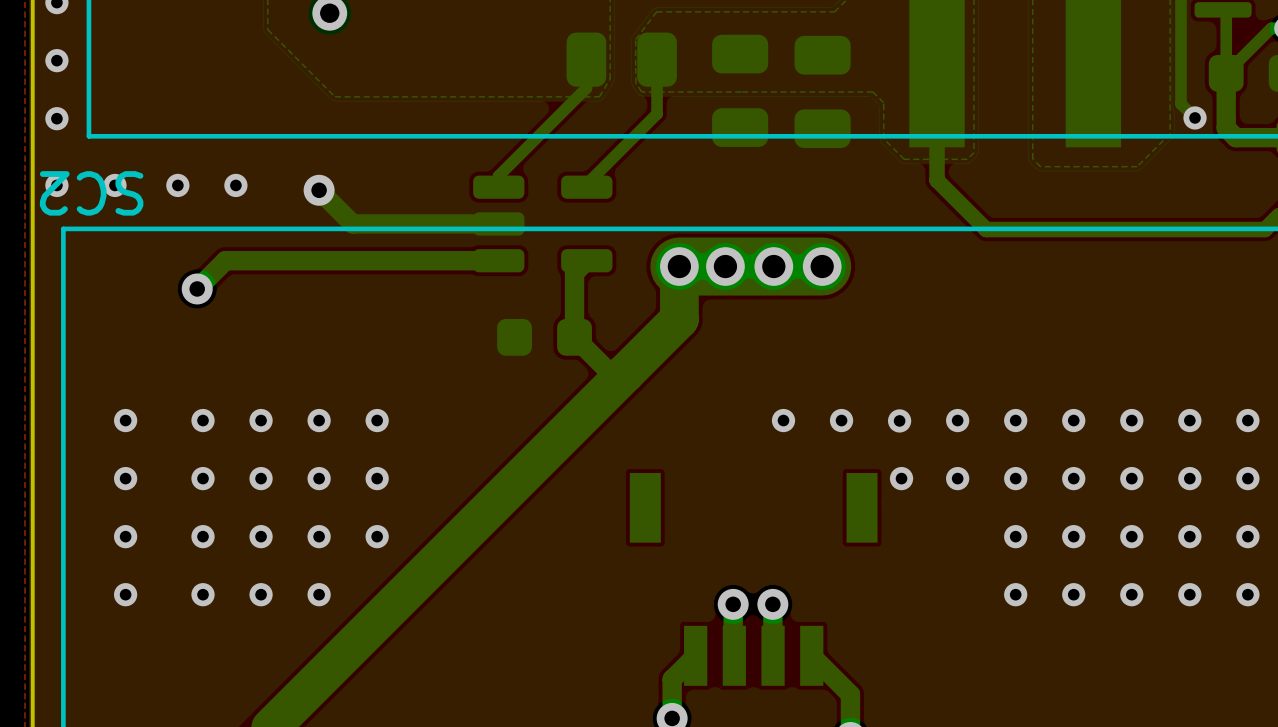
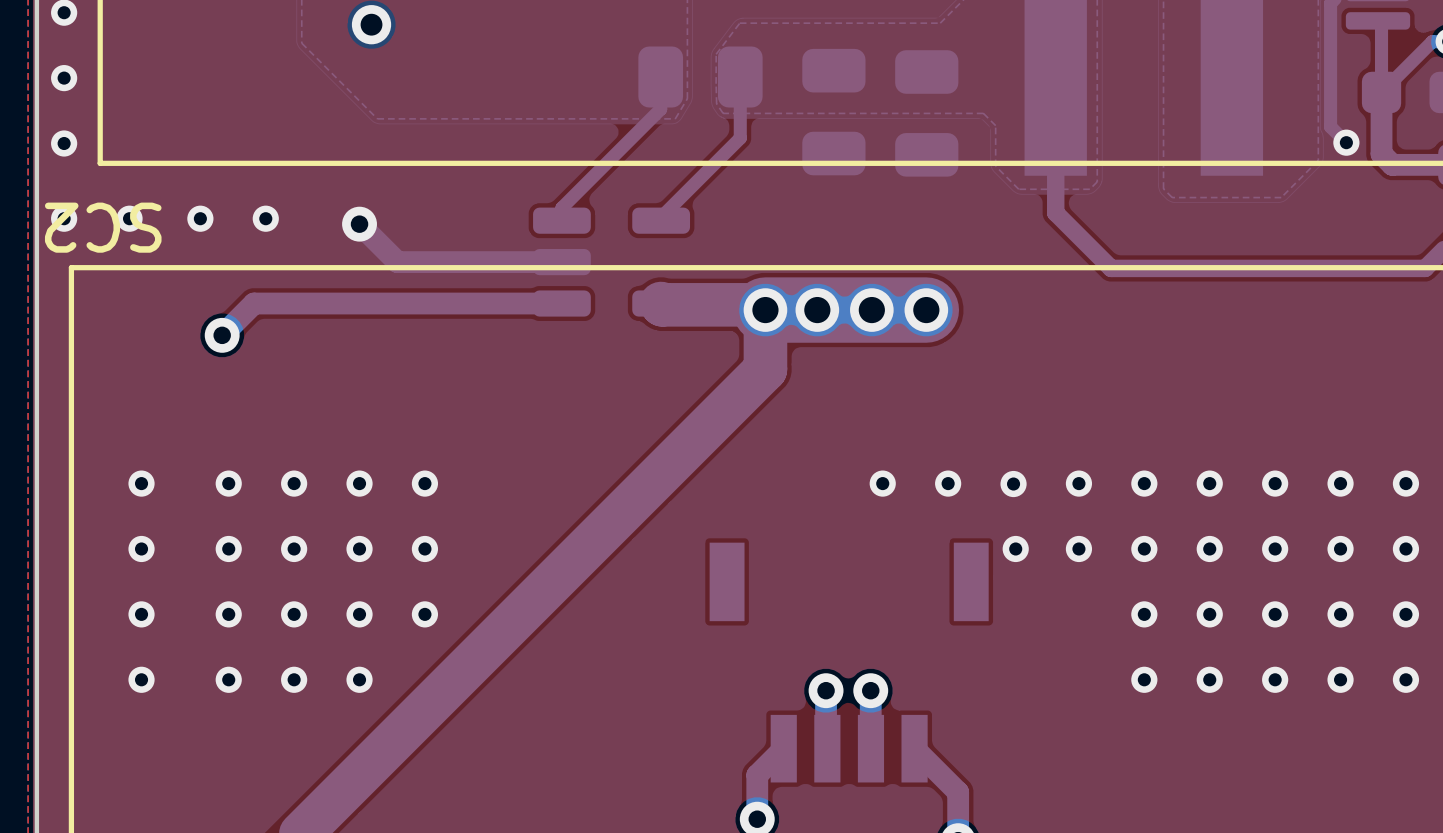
bottom track: (586, 260) (574, 273) (574, 337) (610, 372) (625, 372) -> (661, 303) (760, 304)
part: (544, 337) -> none

